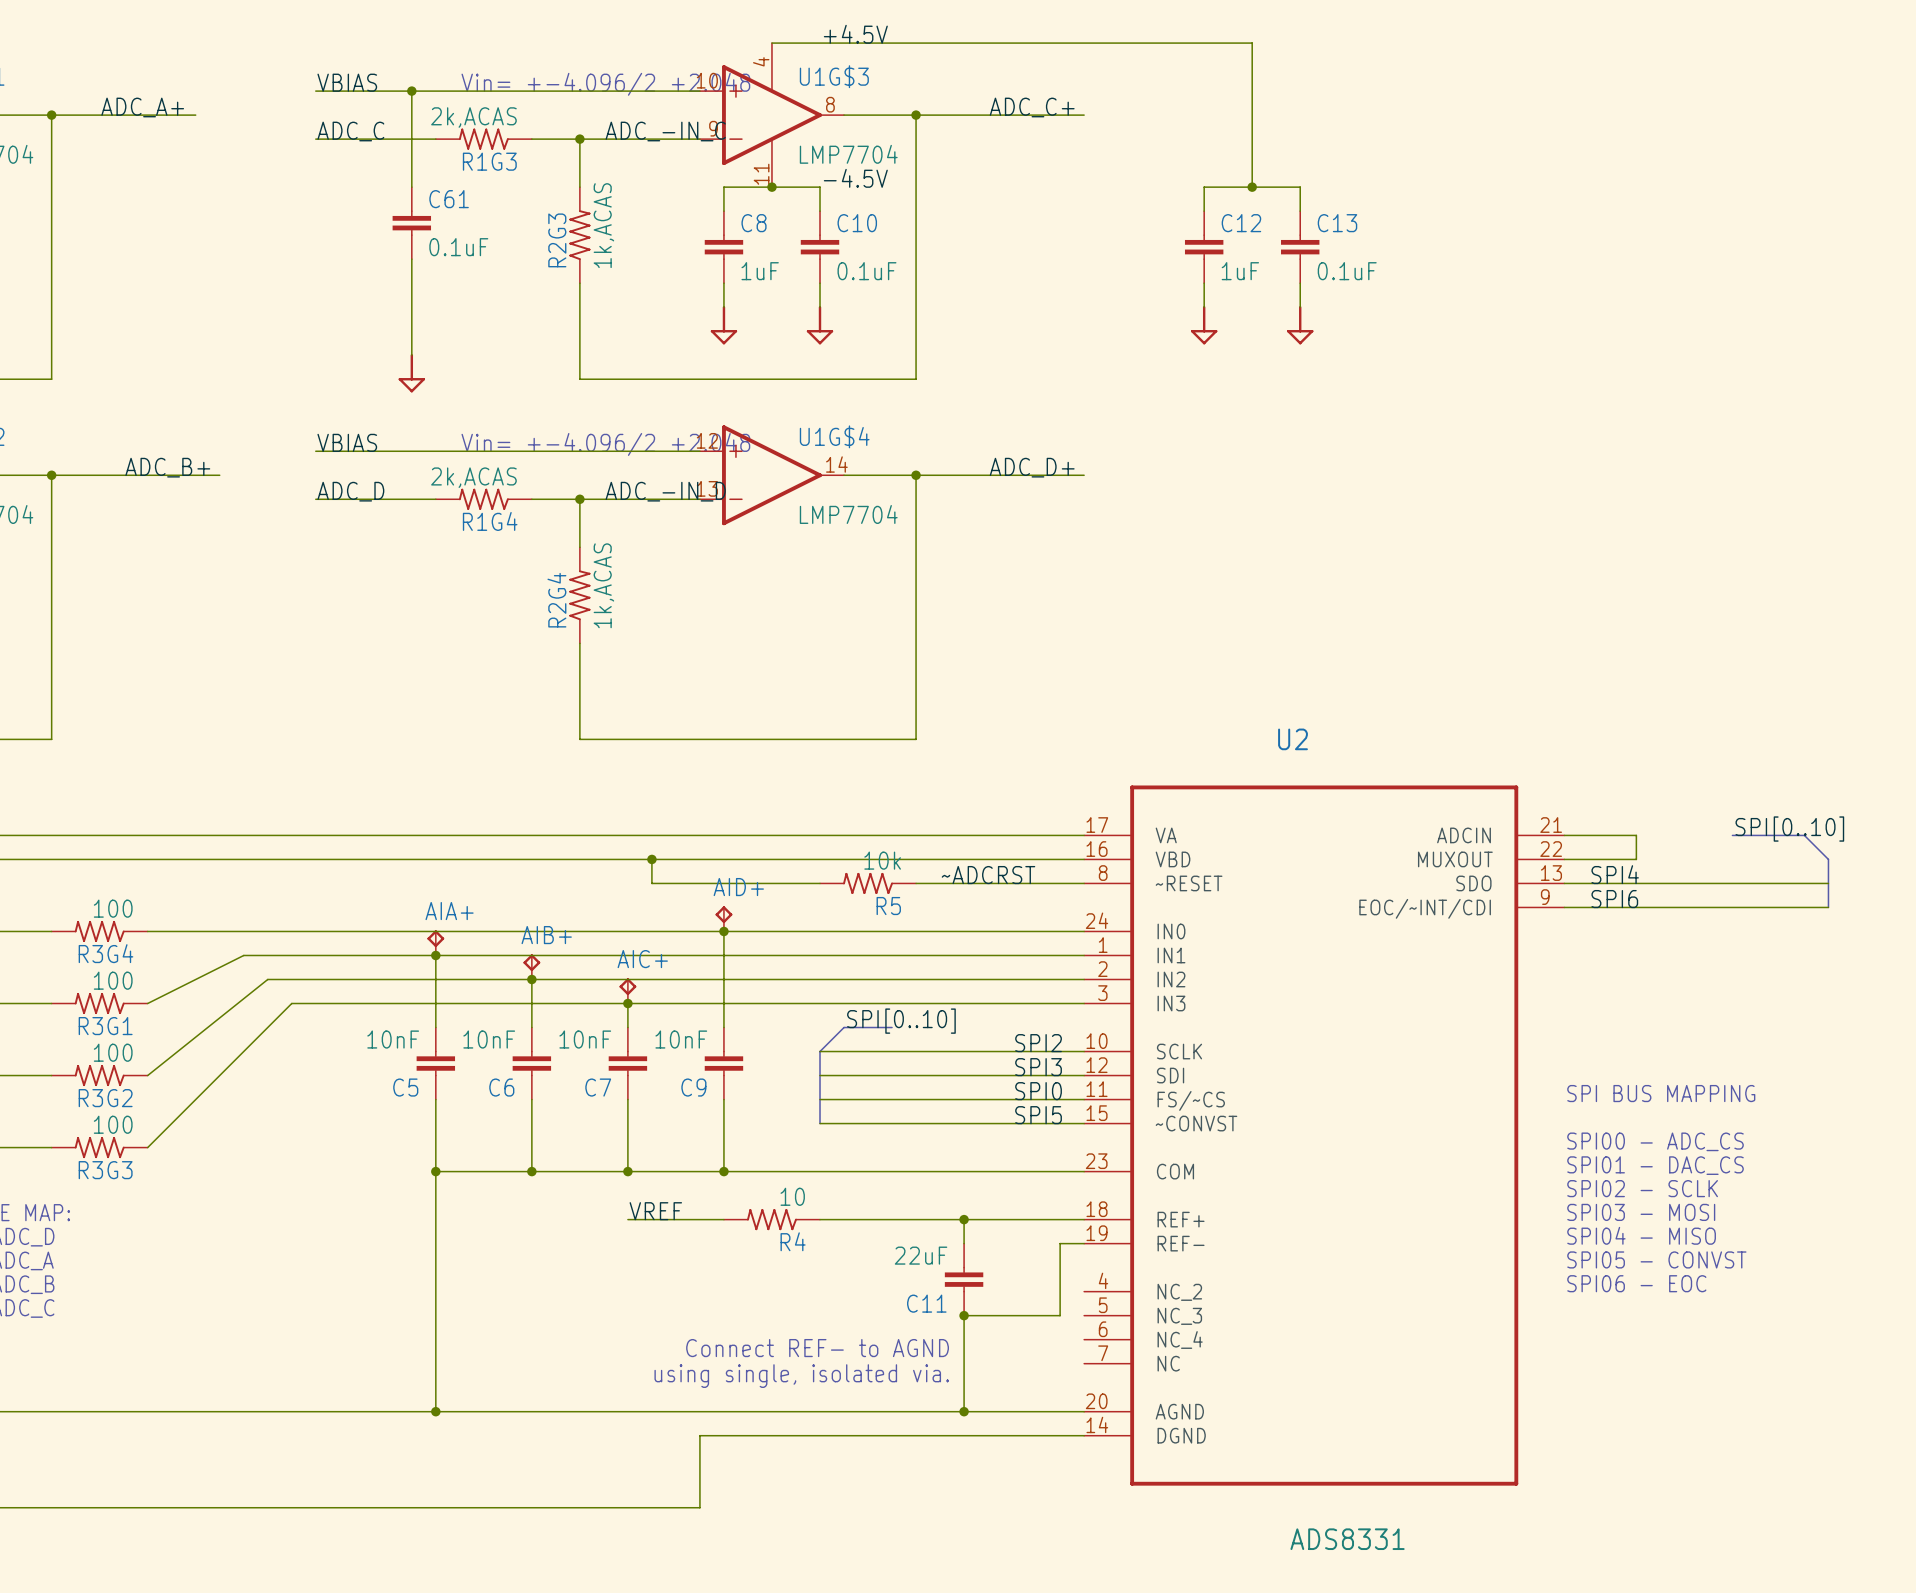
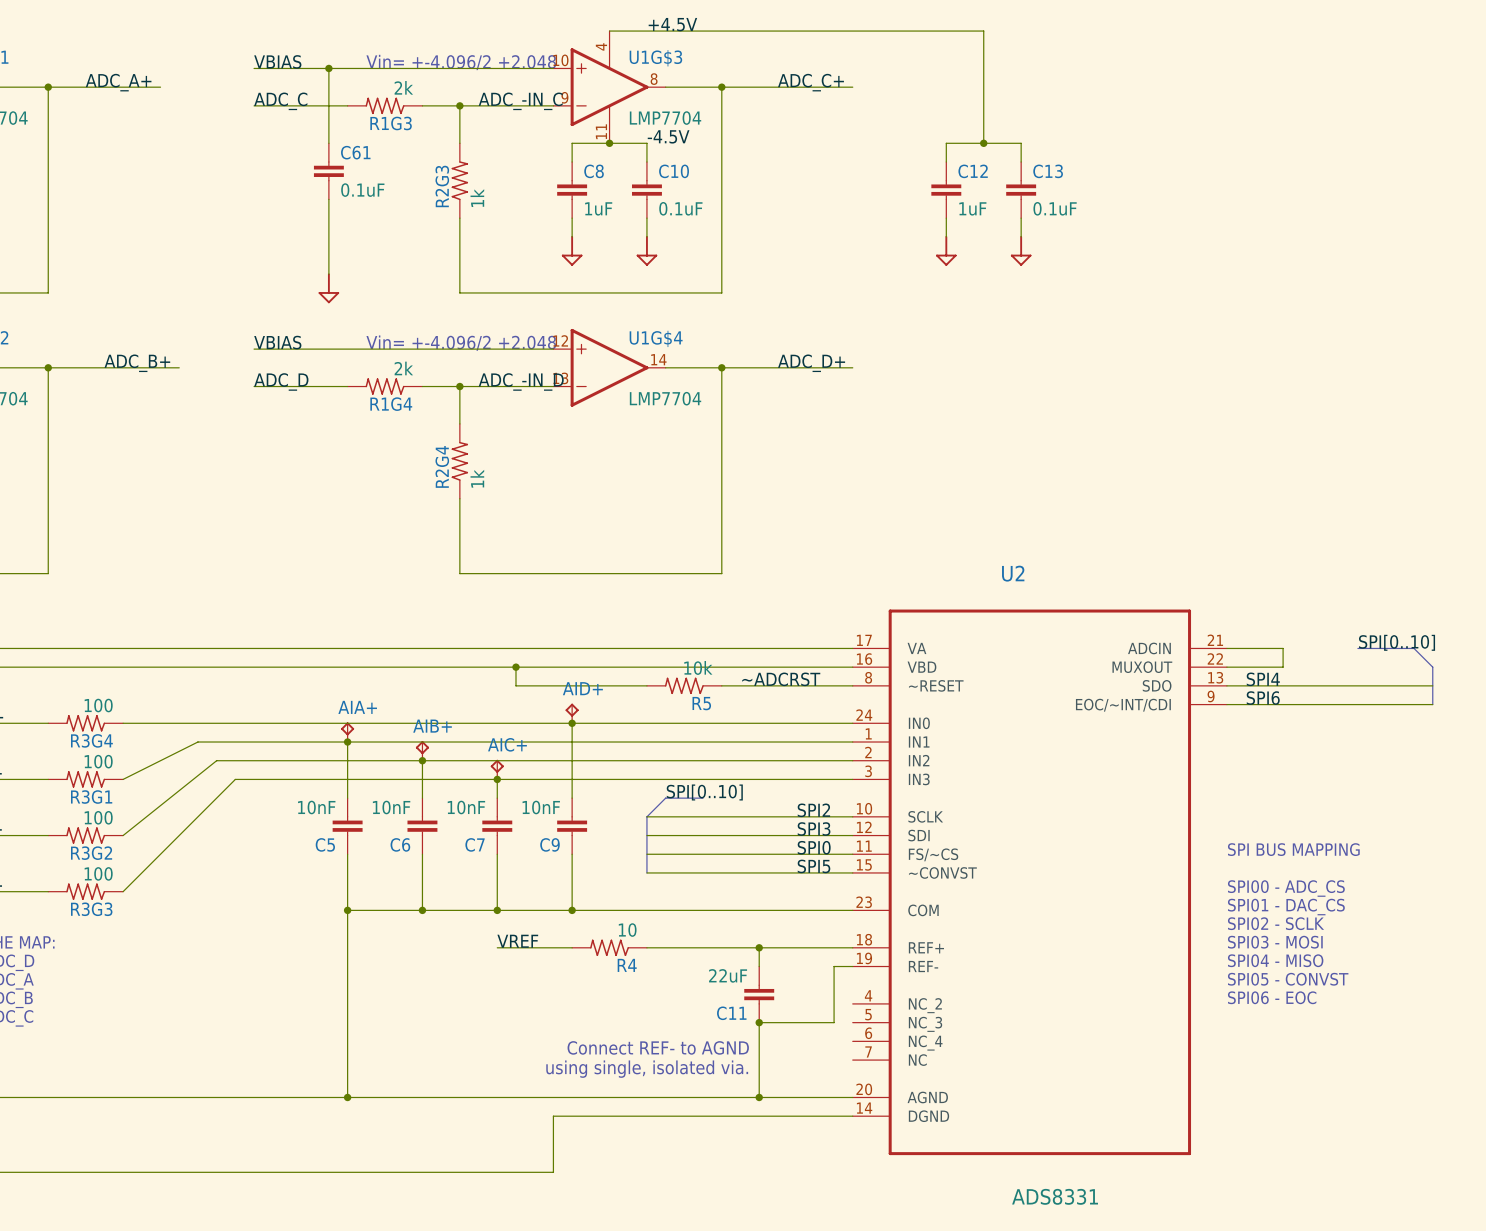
R1G3 value: 2k,ACAS (473, 117) -> 2k (403, 87)
R2G3 value: 1k,ACAS (603, 225) -> 1k (477, 198)
R1G4 value: 2k,ACAS (473, 477) -> 2k (403, 368)
R2G4 value: 1k,ACAS (603, 585) -> 1k (477, 478)

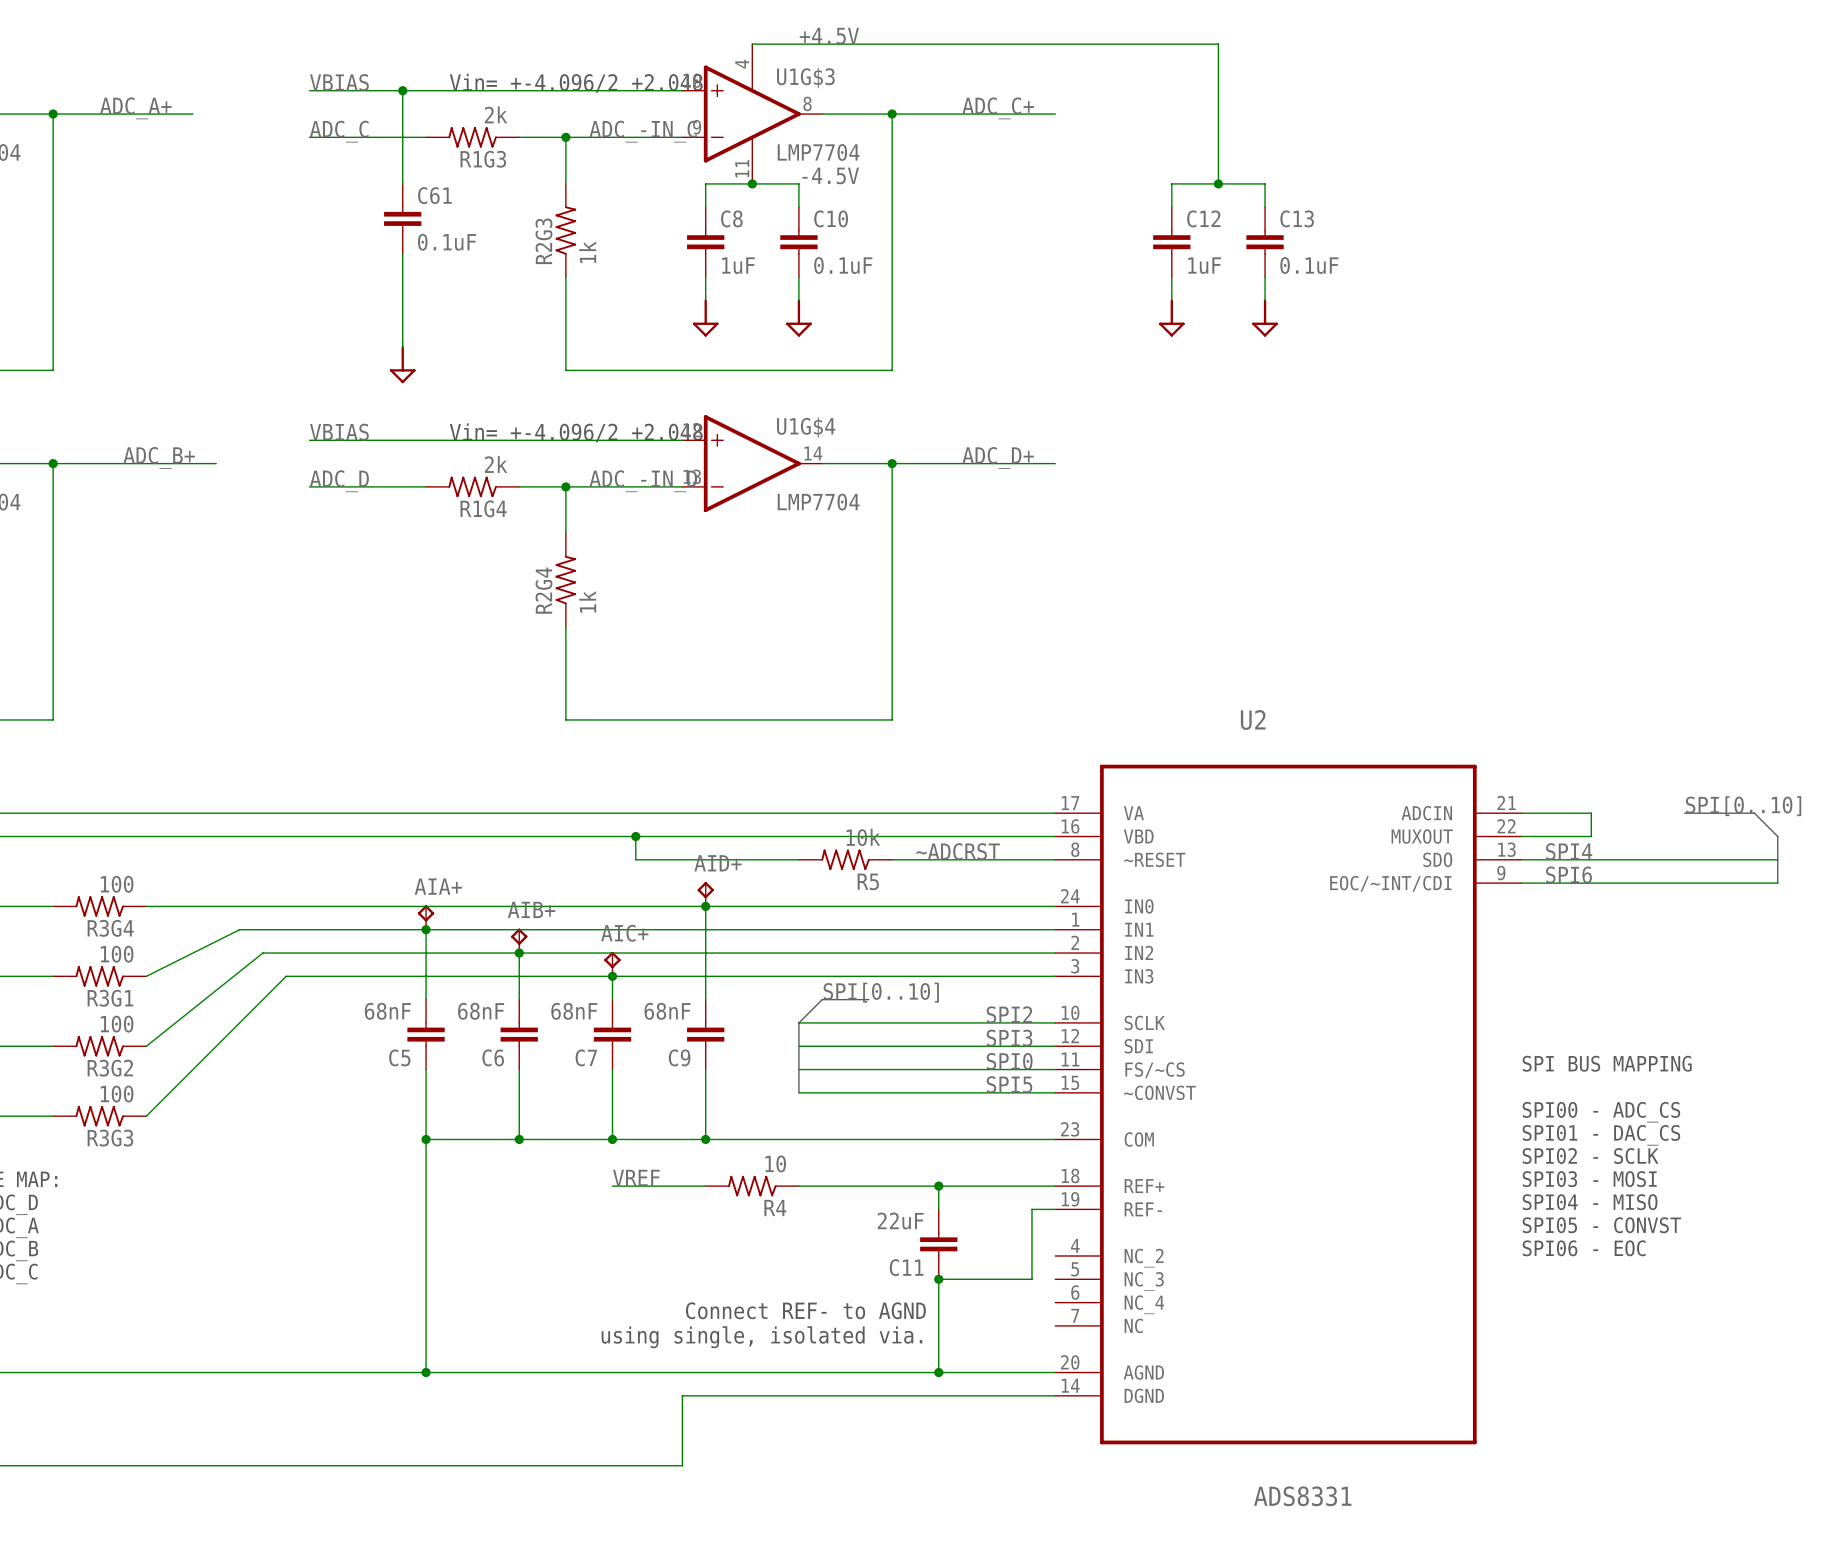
C5 value: 10nF (316, 807) -> 68nF (387, 1011)
C6 value: 10nF (391, 807) -> 68nF (481, 1011)
C7 value: 10nF (466, 807) -> 68nF (574, 1011)
C9 value: 10nF (541, 807) -> 68nF (667, 1011)

